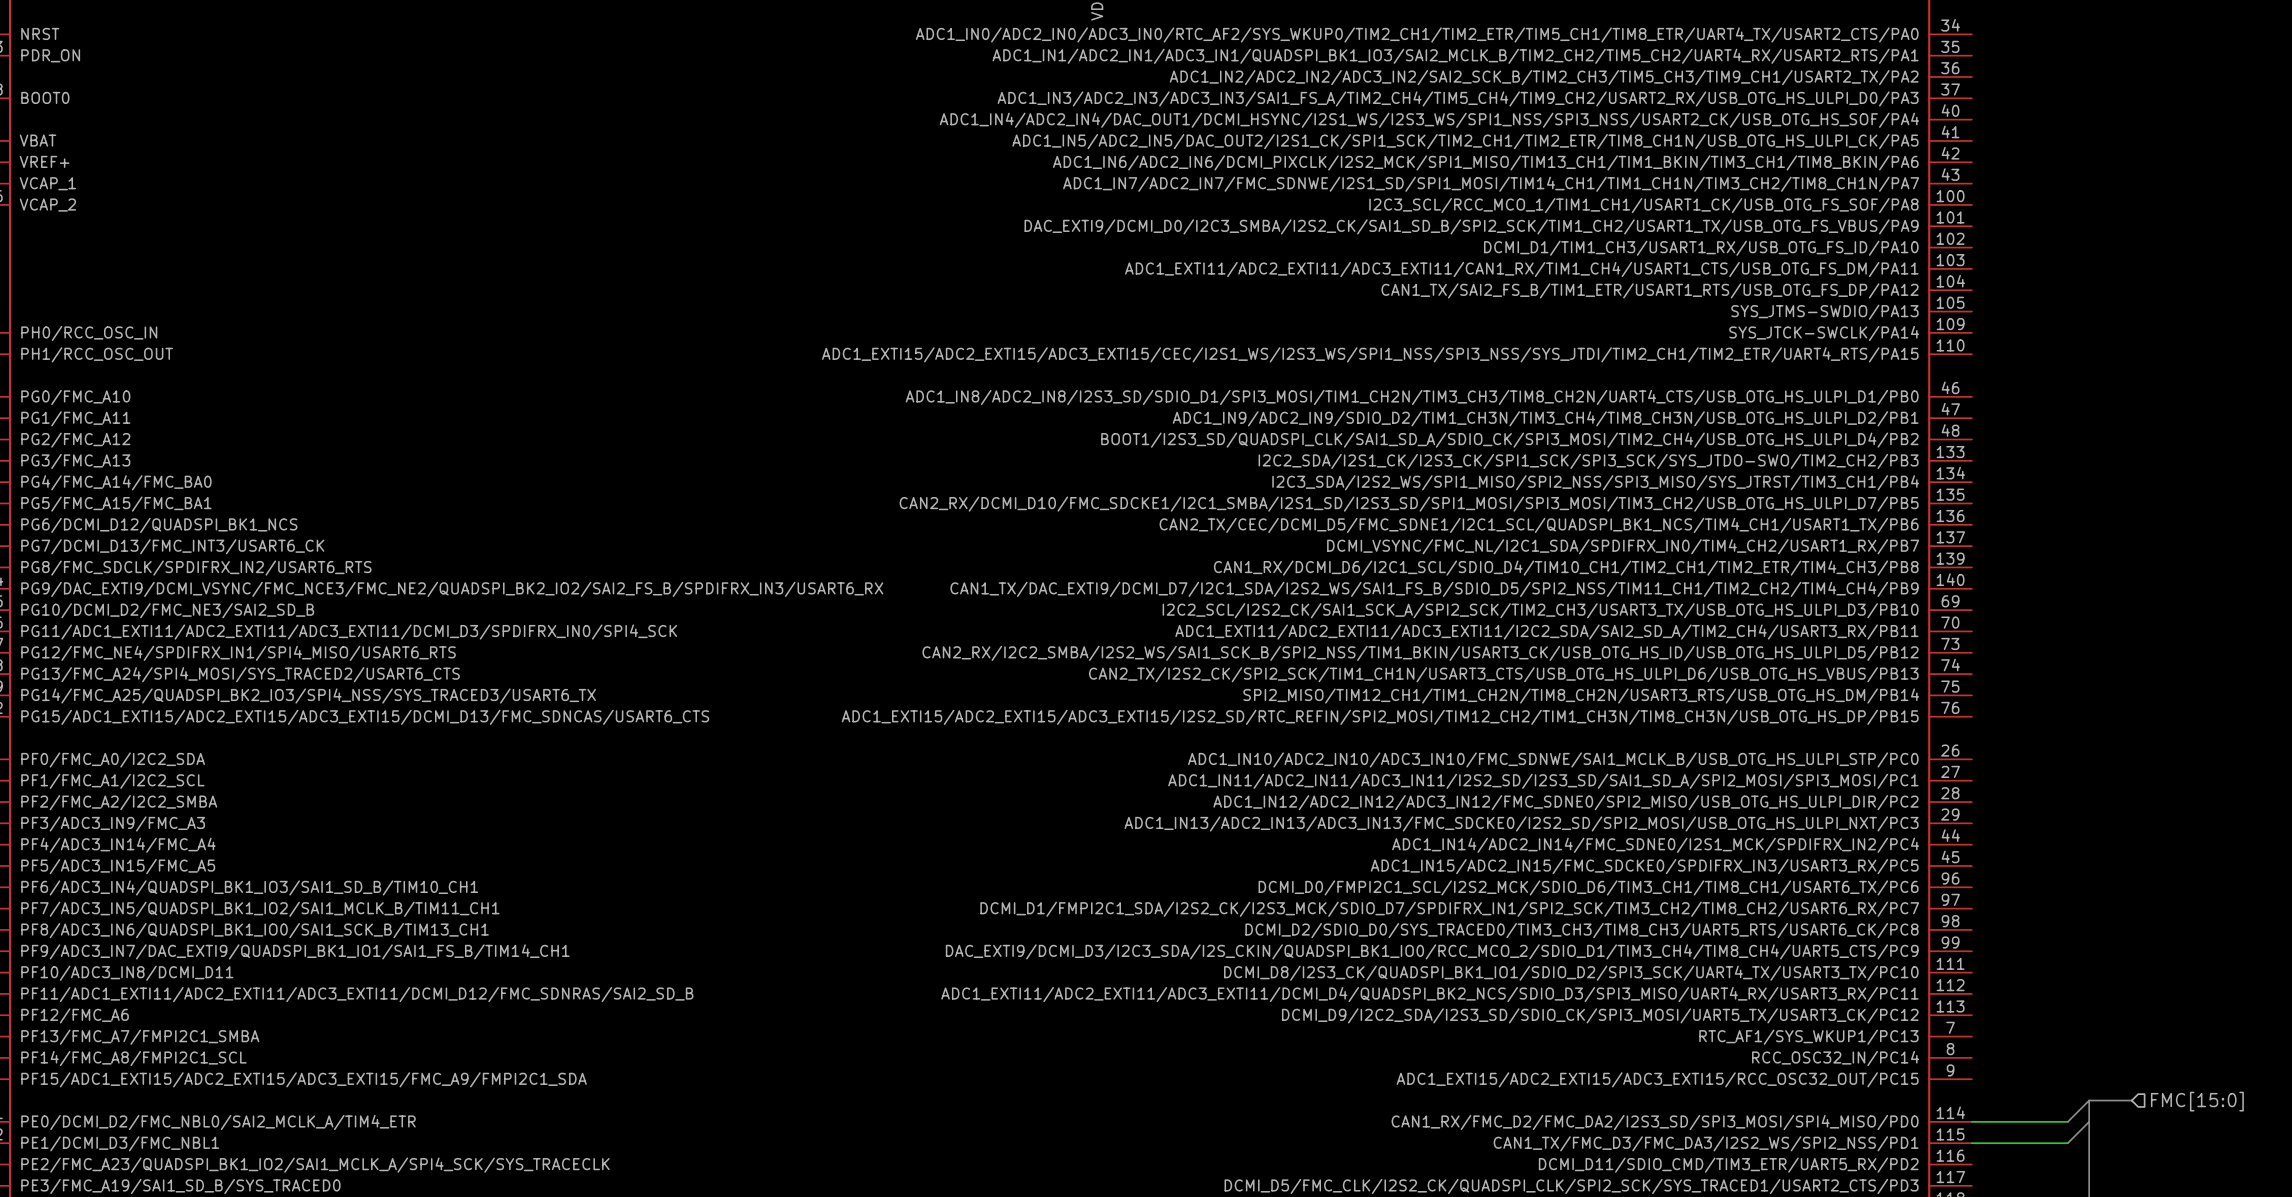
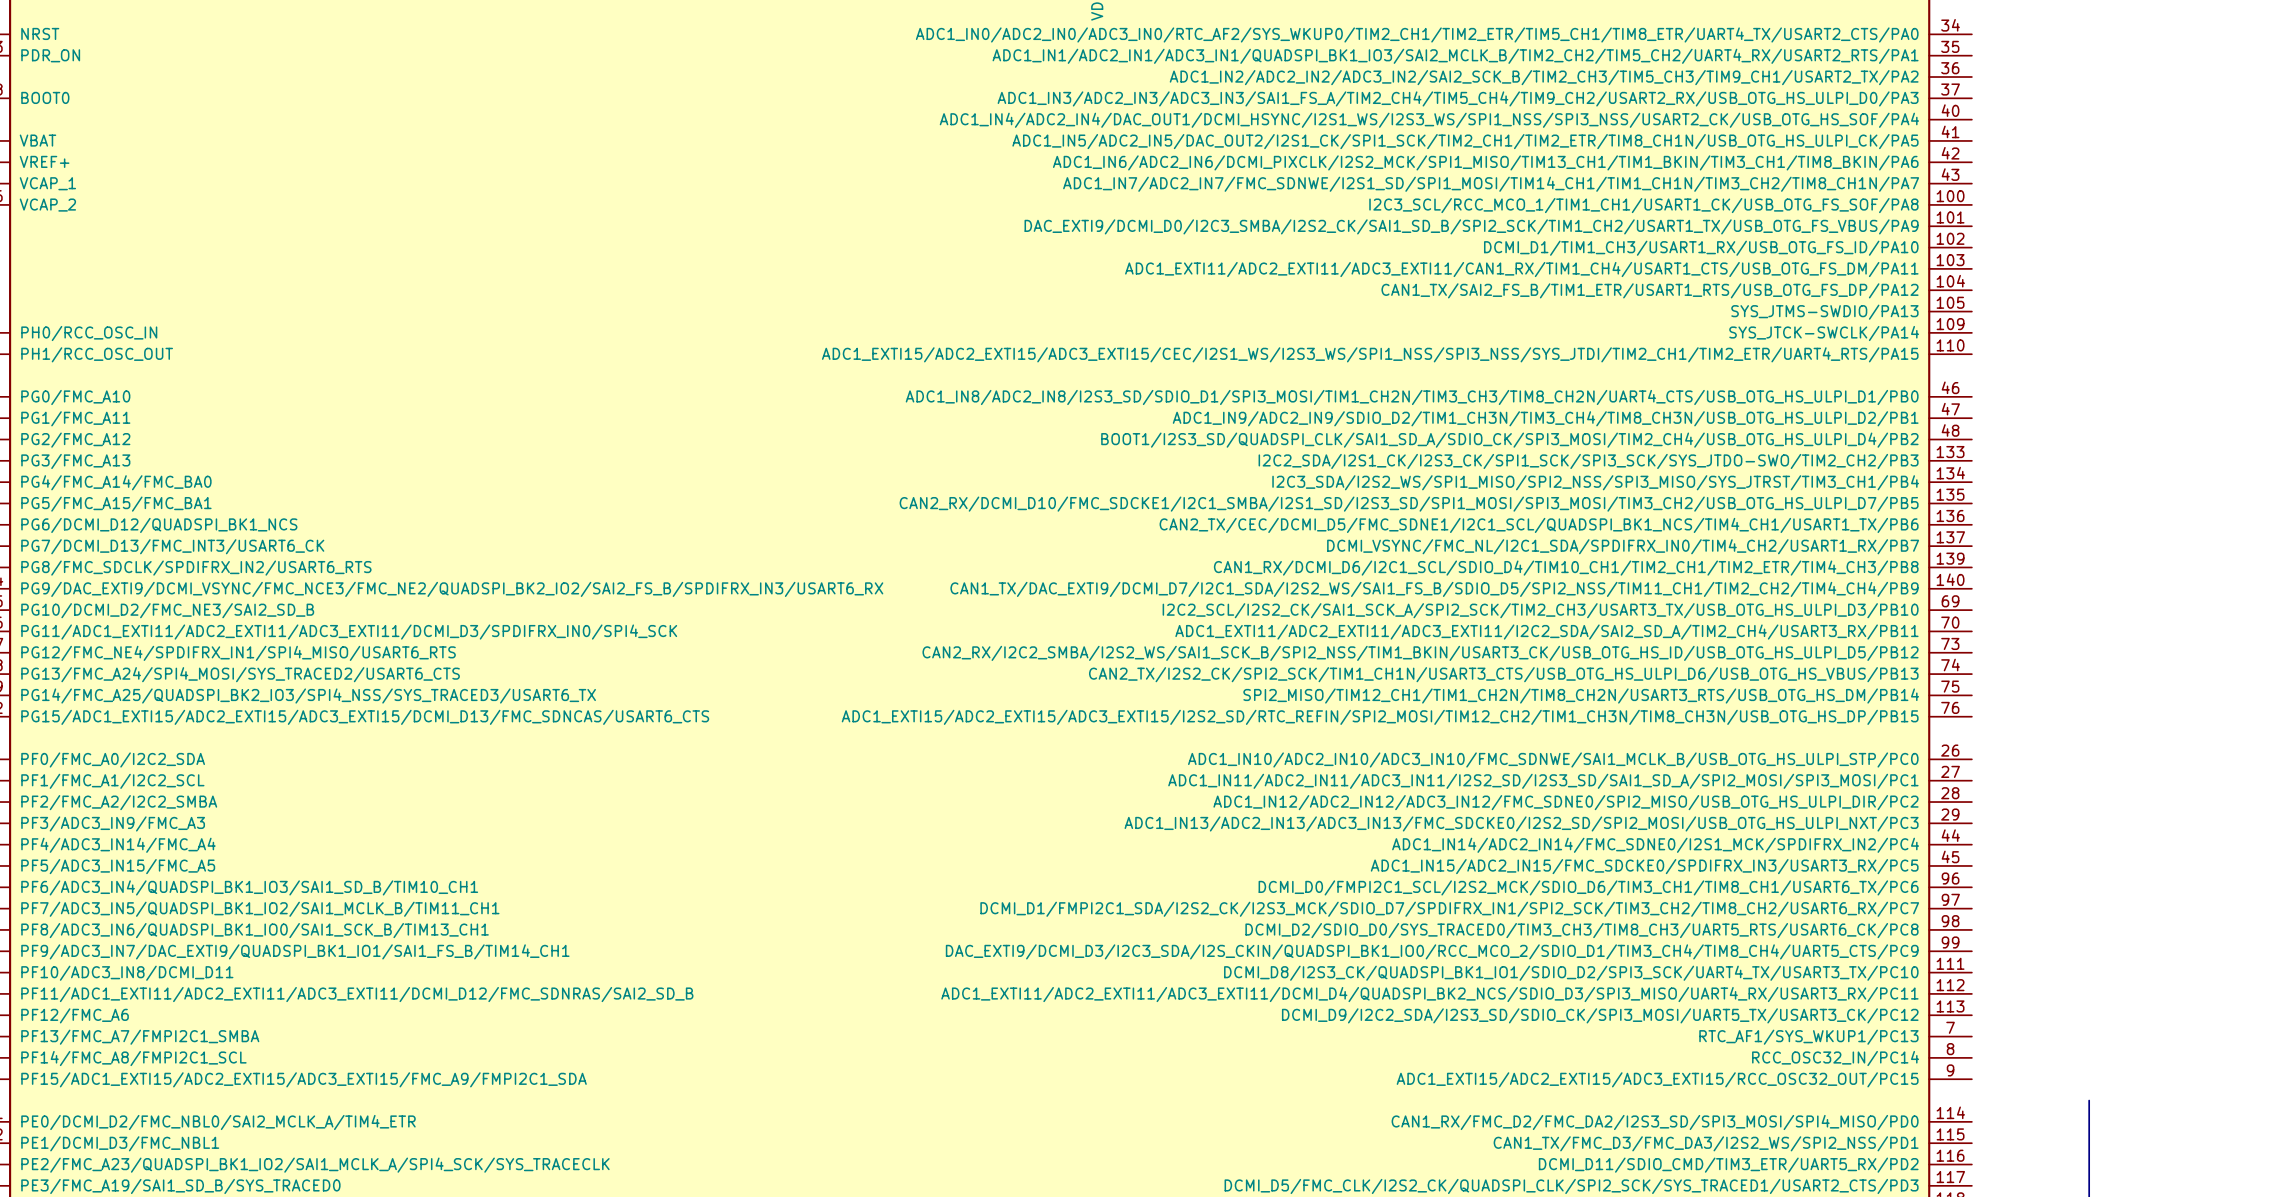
bus: (2131, 1100) (2089, 1100) (2067, 1121) -> none
hierarchical label: FMC[15:0] (2197, 1101) -> none
wire: (1971, 1121) (2067, 1121) -> none
bus: (2089, 1121) (2067, 1143) -> none
wire: (1971, 1143) (2067, 1143) -> none

